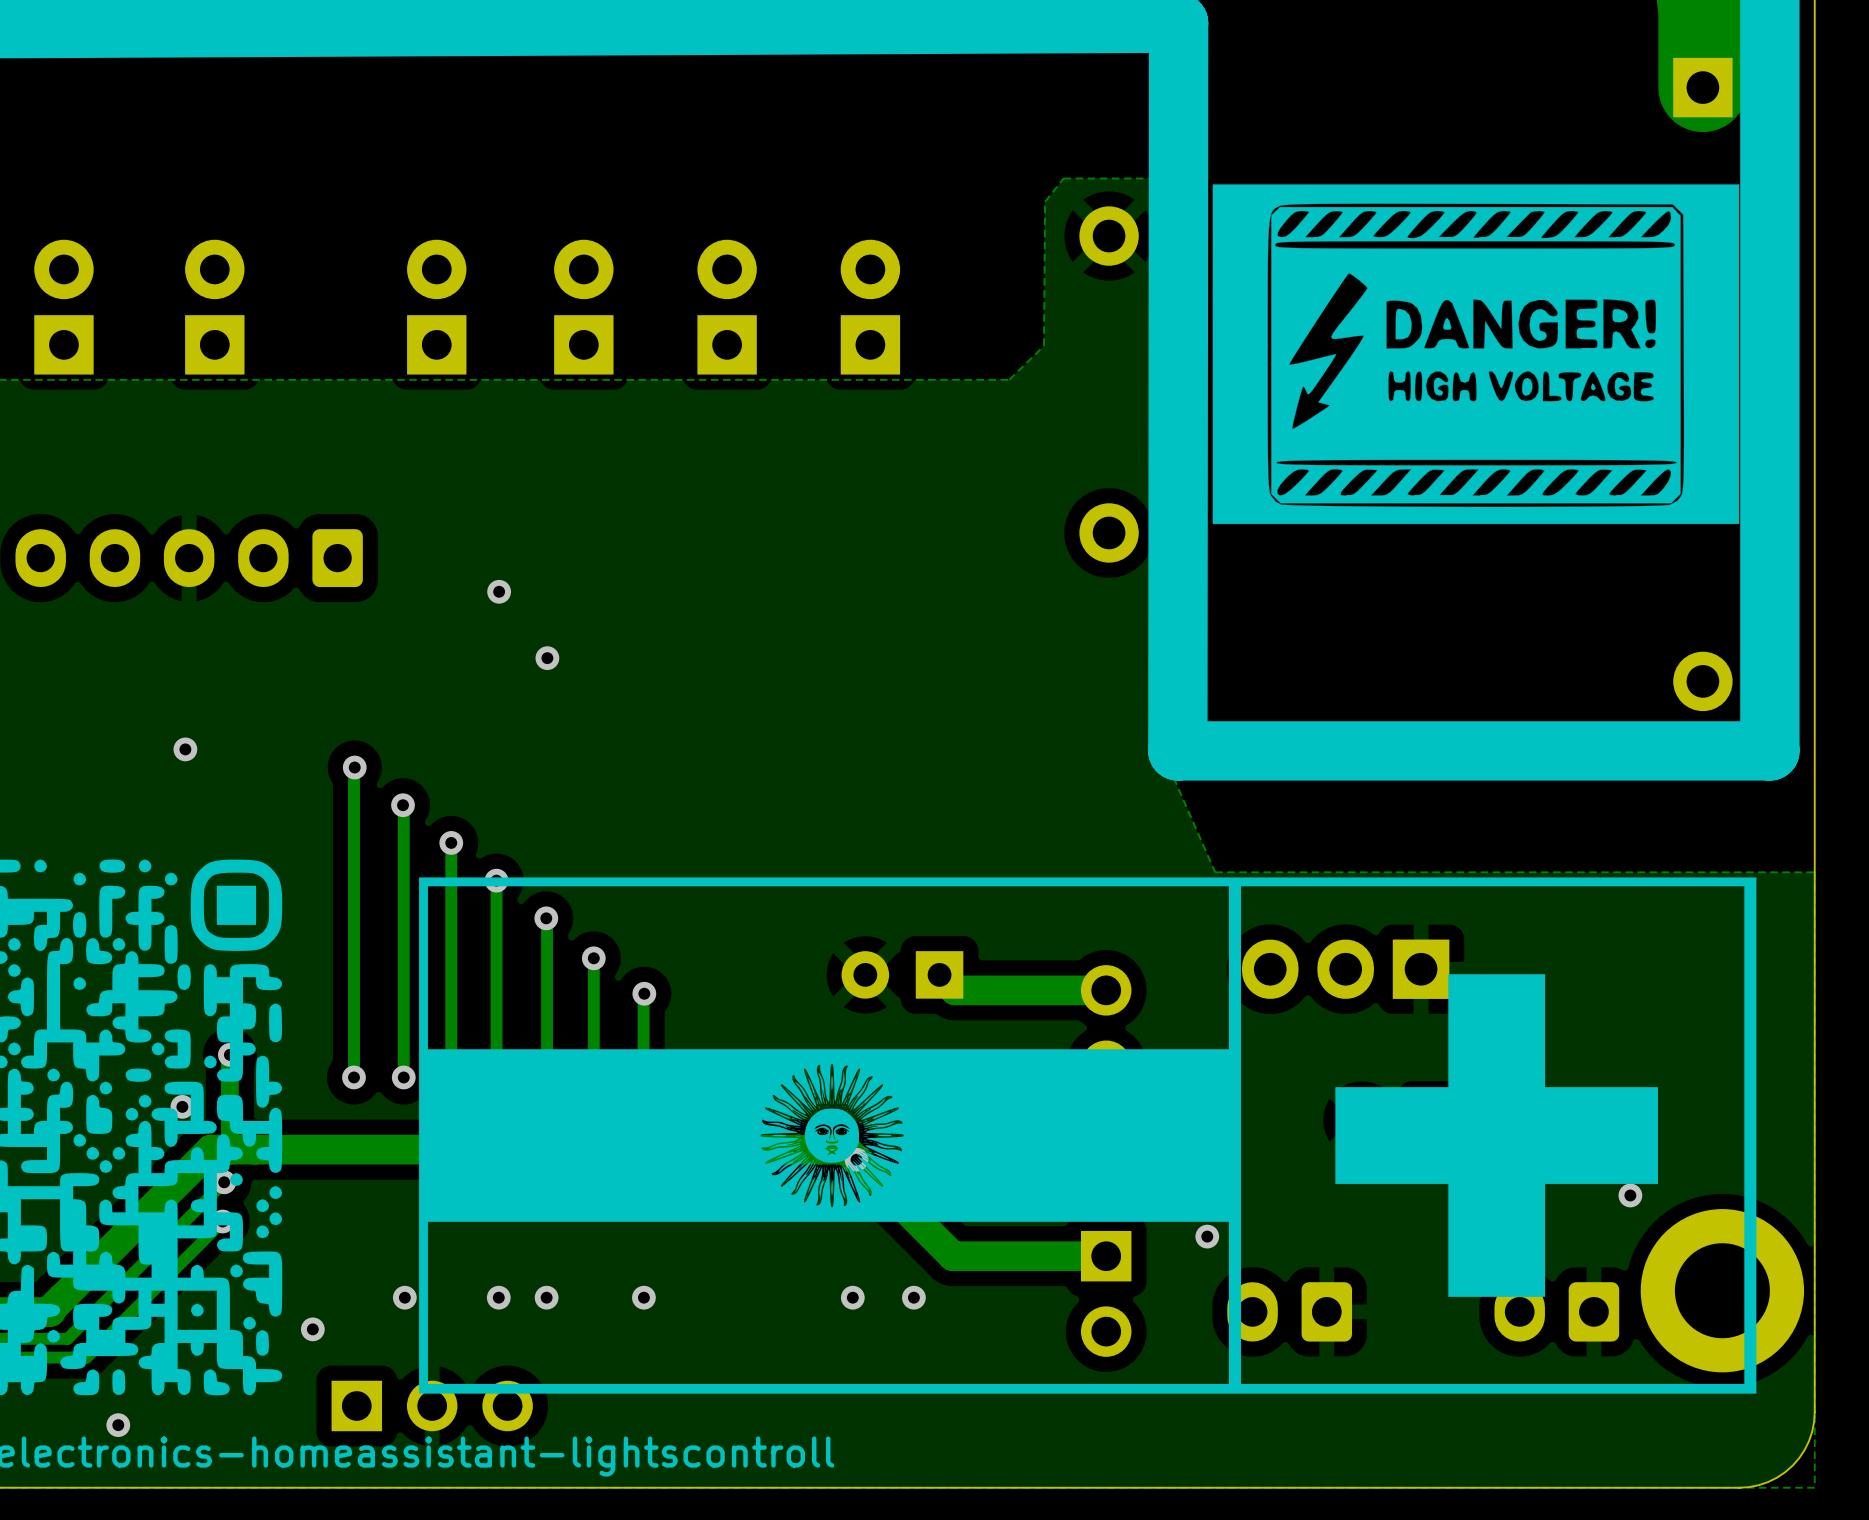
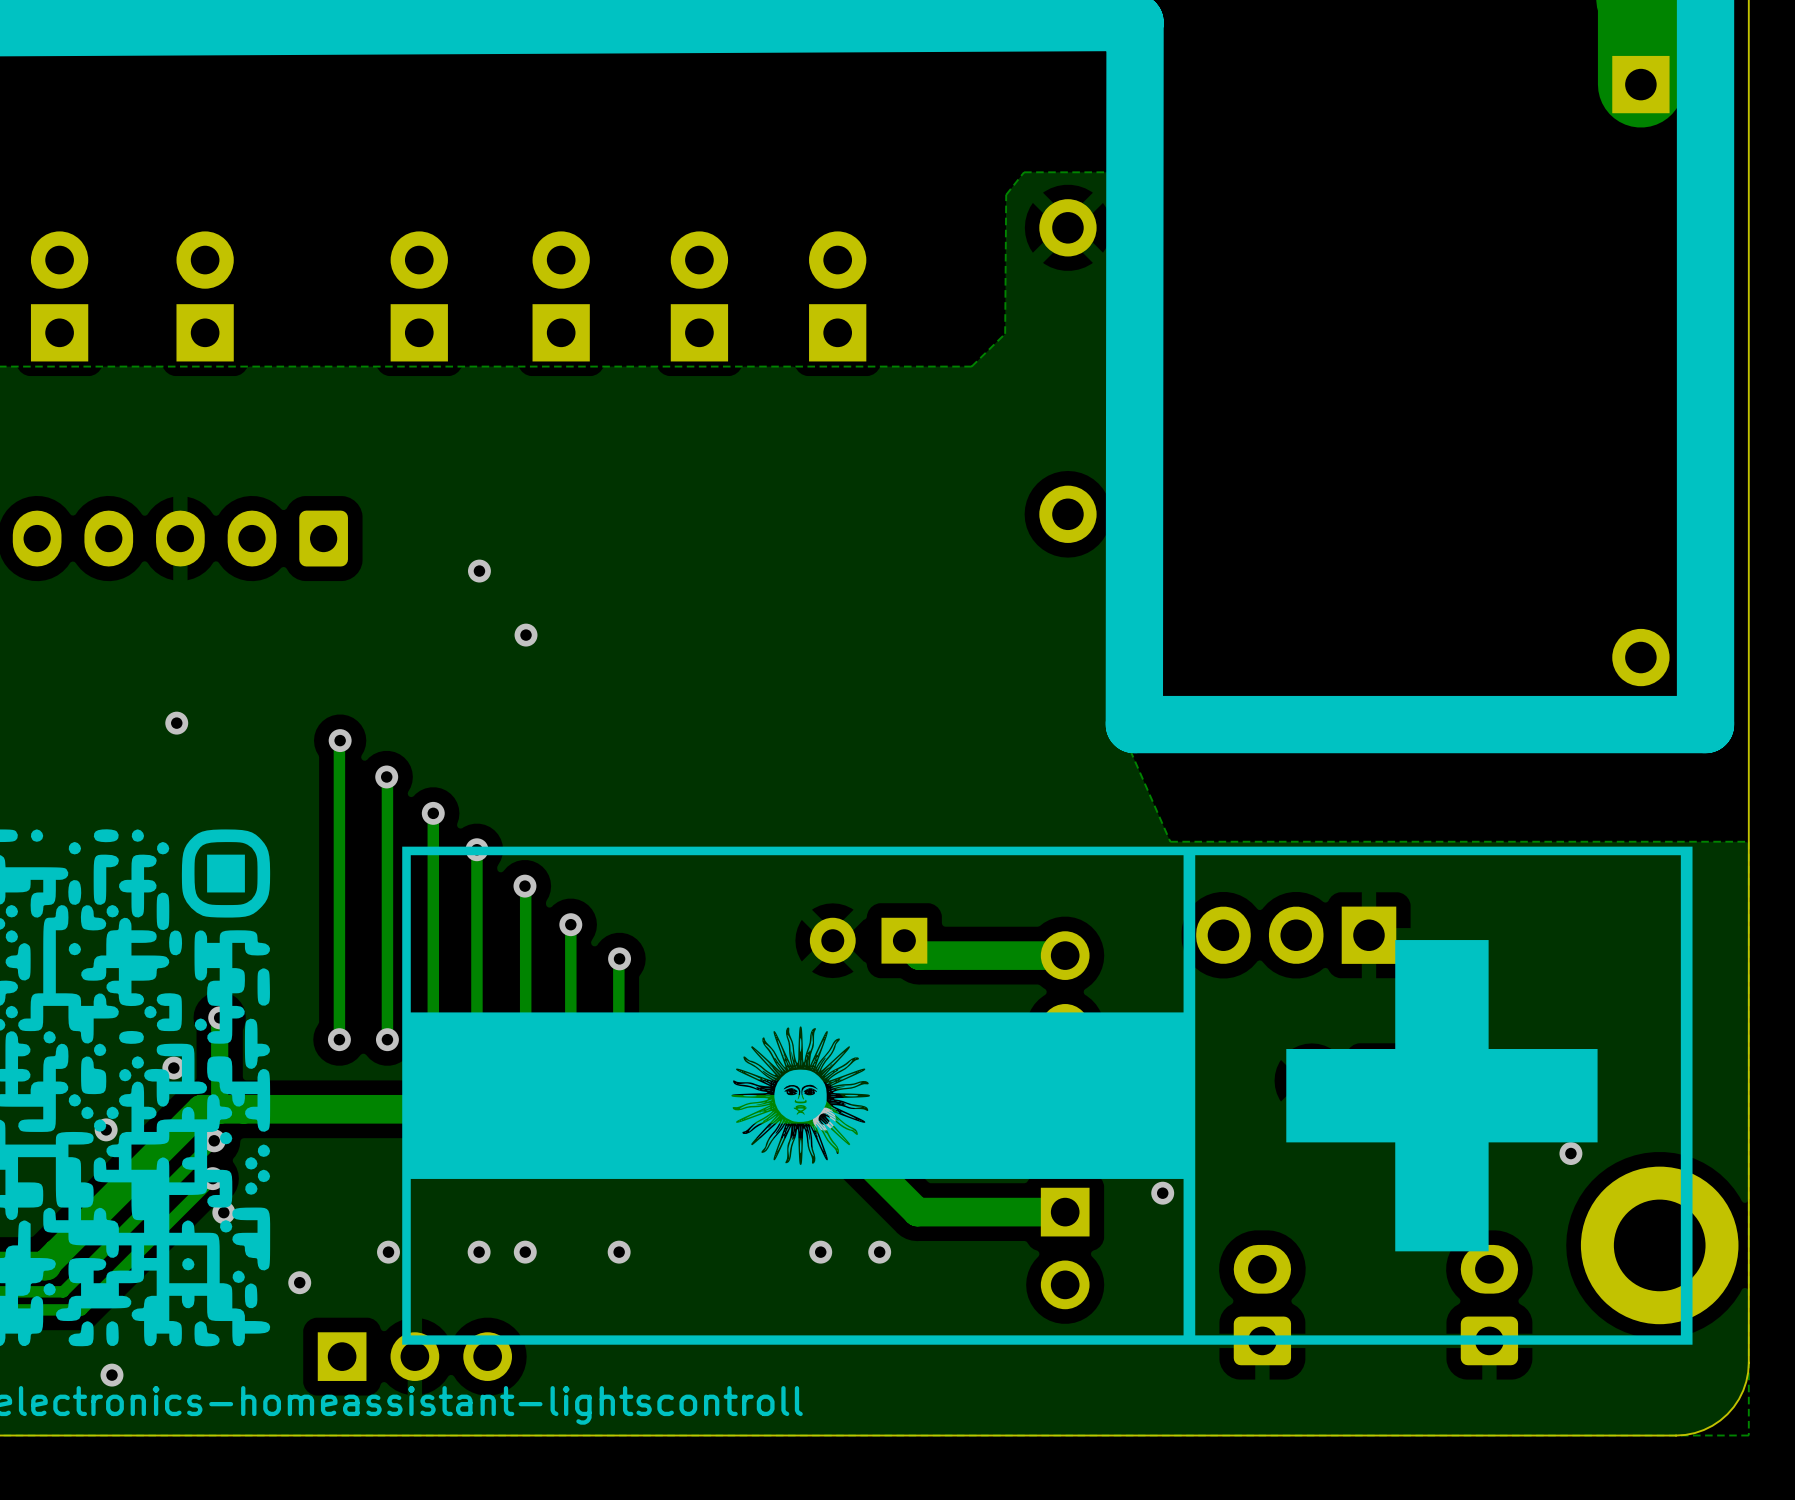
drawing: [1212, 184, 1740, 525] -> none
via: none -> (106, 1129)
via: none -> (223, 1212)
part rotation: 0° (1289, 1311) -> 90° clockwise (1262, 1305)
part rotation: 0° (1556, 1311) -> 90° clockwise (1489, 1305)

